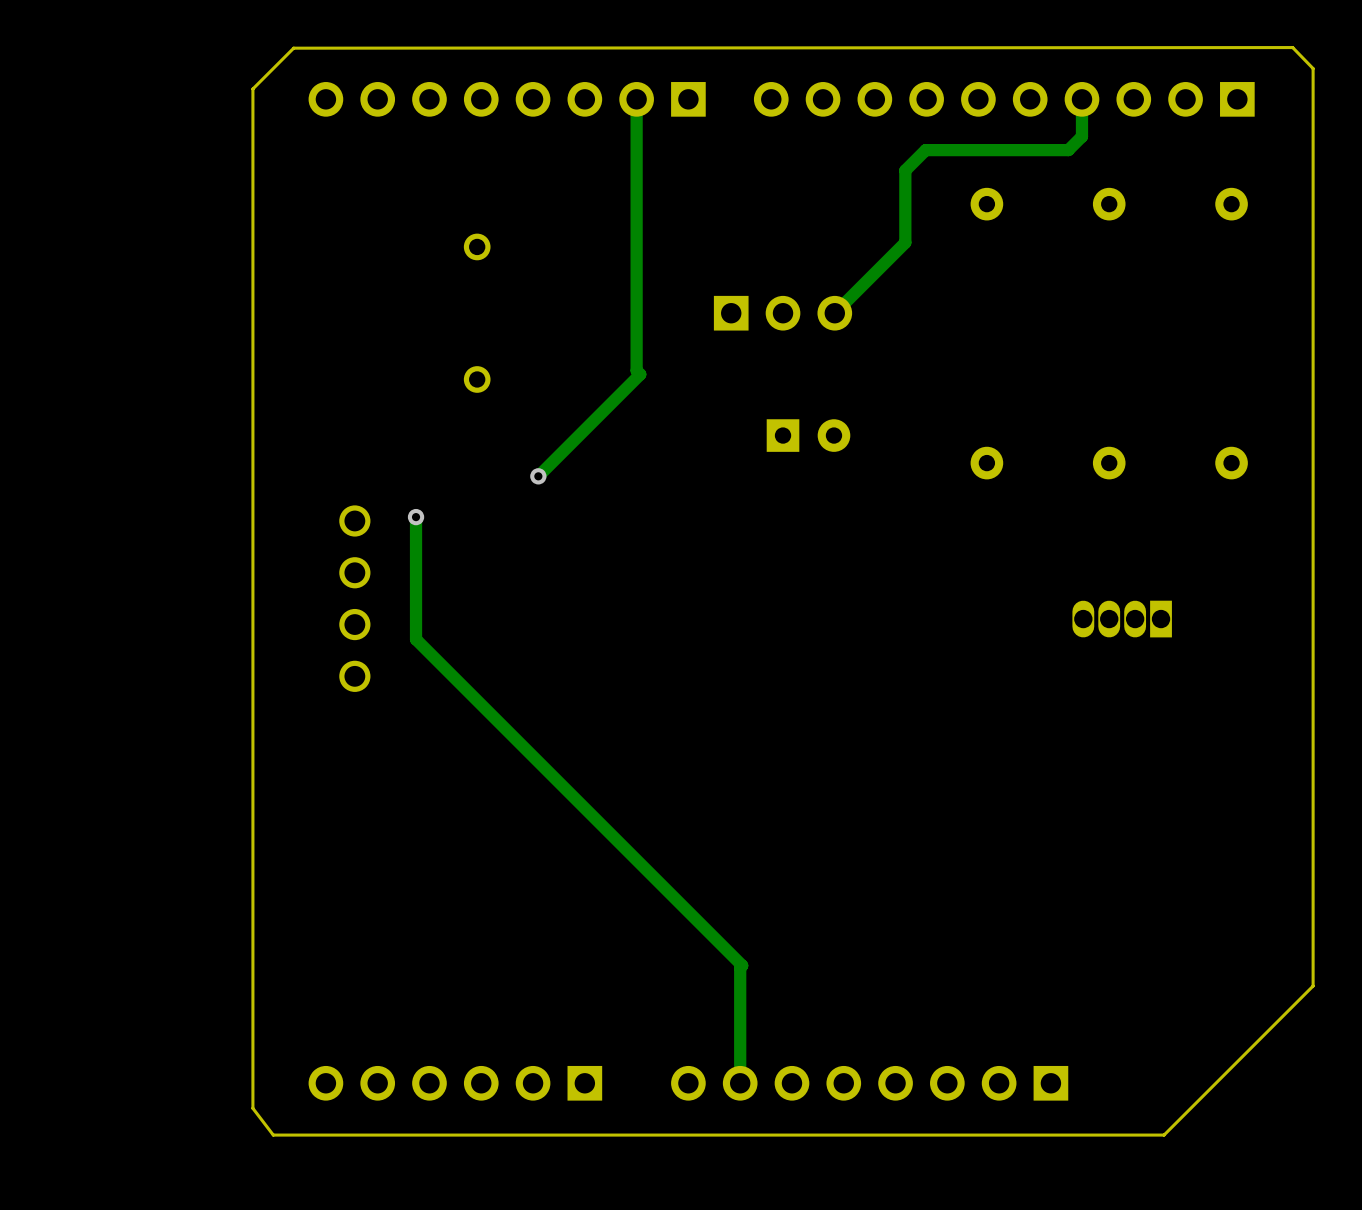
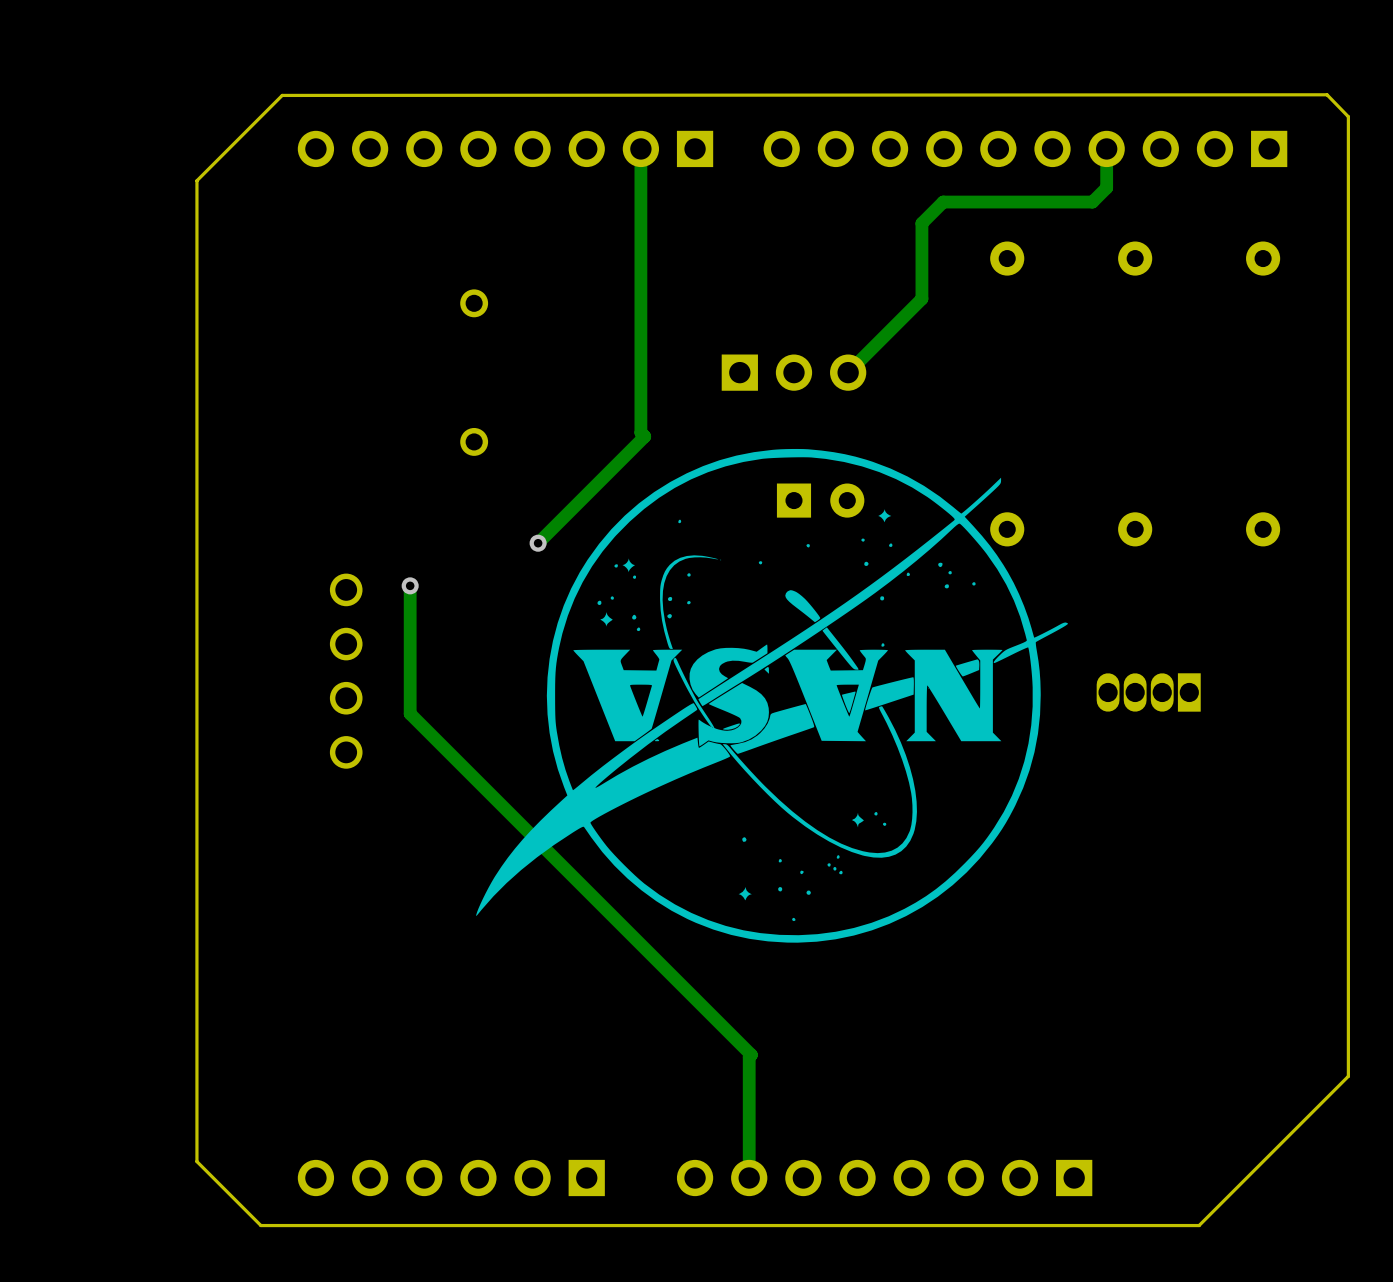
board edge: (252, 88) (252, 1108) (273, 1135) (1164, 1135) (1170, 1128) -> (239, 138) (196, 180) (196, 1161) (260, 1225) (1199, 1225)
drawing: none -> [476, 448, 1069, 943]

